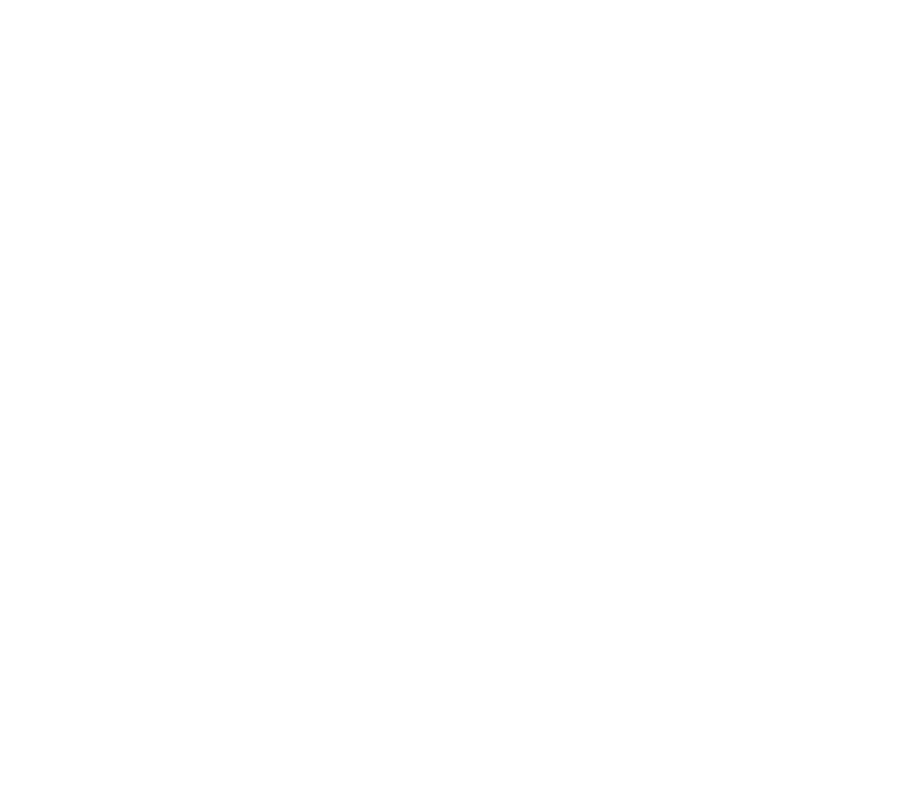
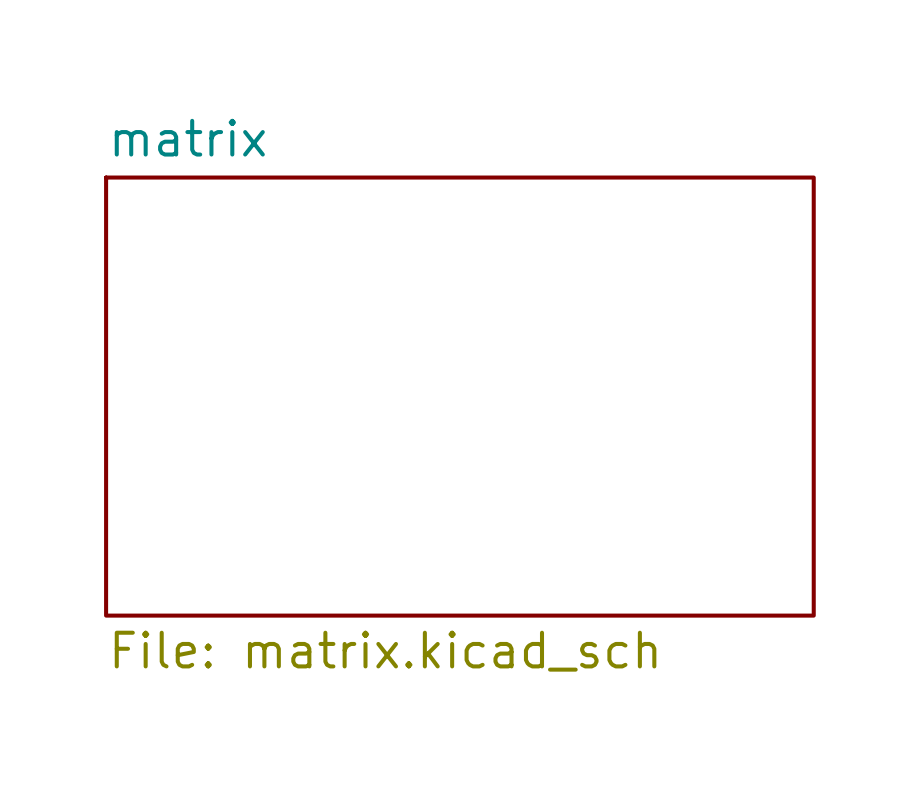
sheet matrix: none -> File: matrix.kicad_sch (459, 396)

